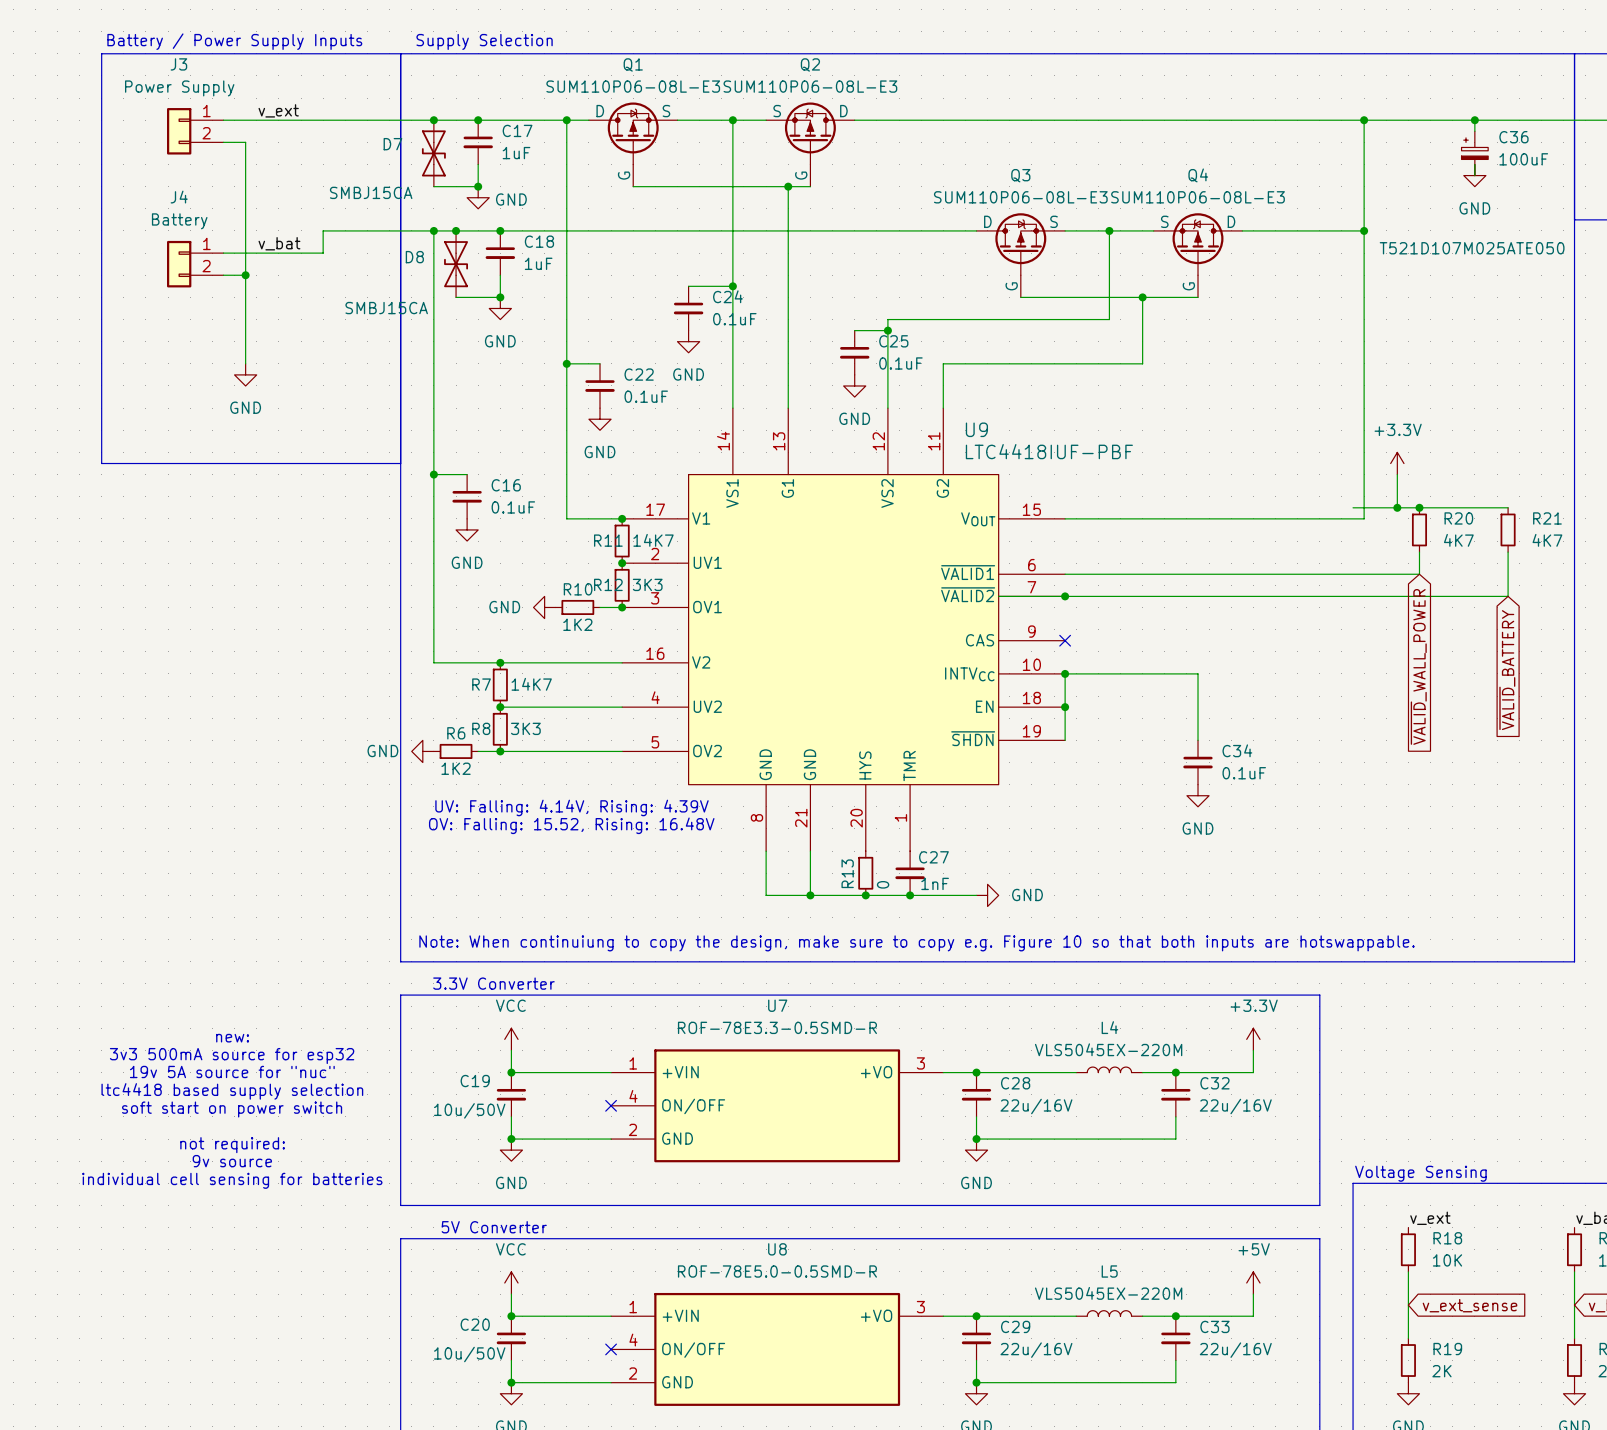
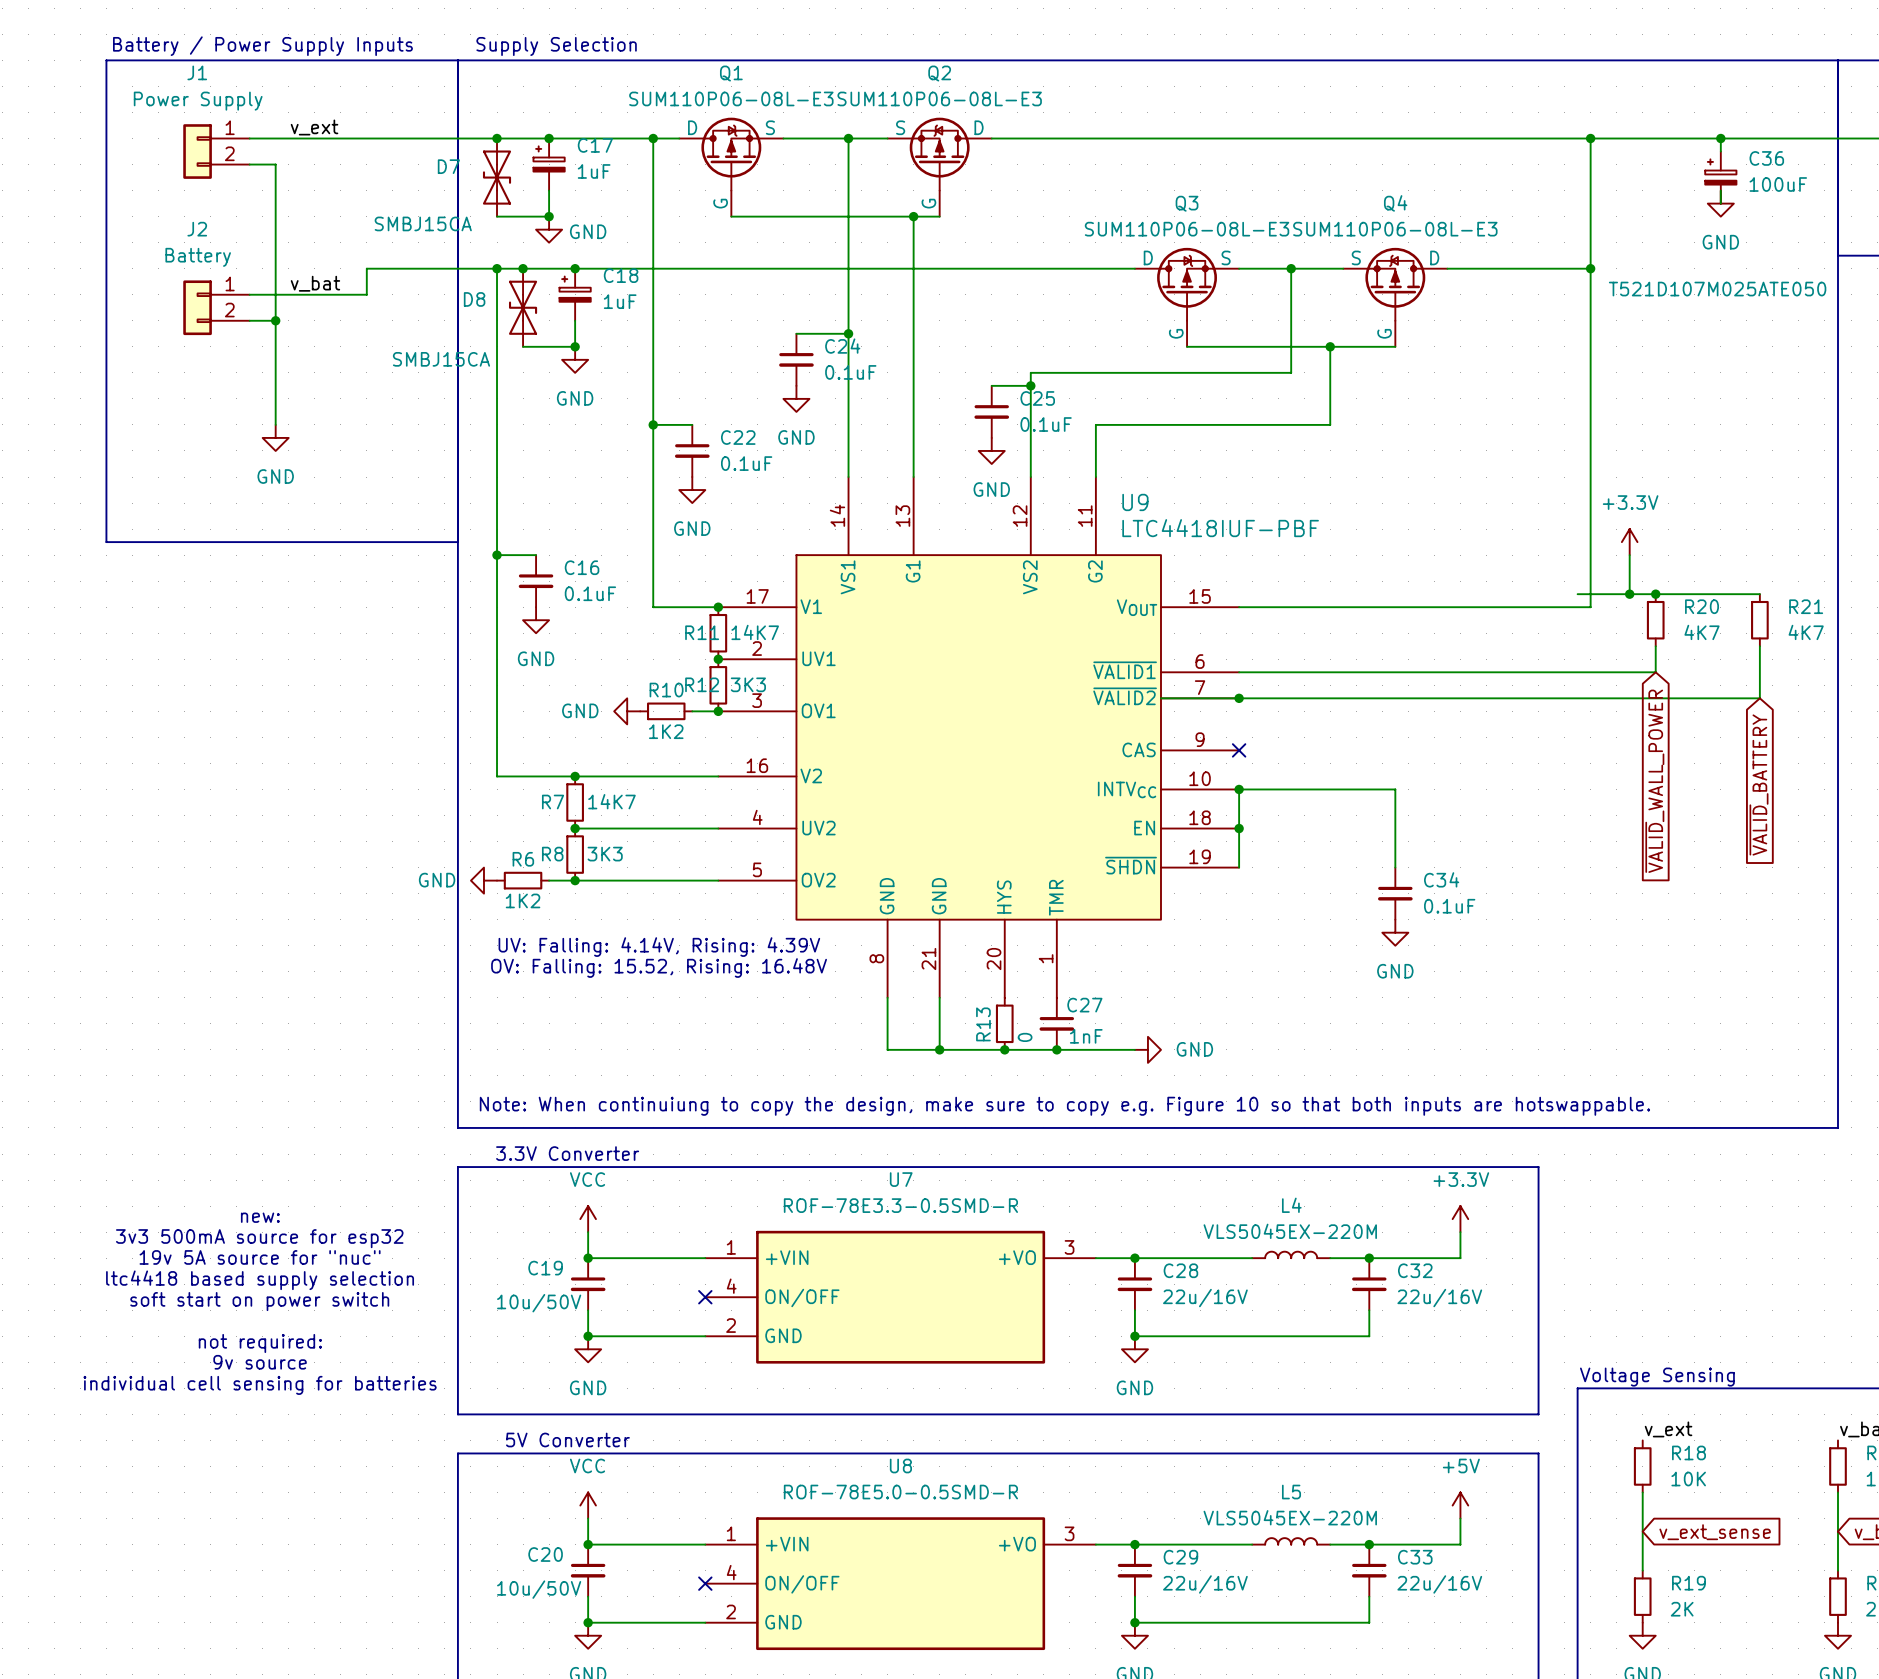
J3 name: J3 (178, 64) -> J1 (197, 72)
C17 symbol: [463, 120, 493, 165] -> [533, 138, 565, 191]
J4 name: J4 (179, 197) -> J2 (197, 229)
C18 symbol: [485, 230, 516, 276] -> [559, 268, 591, 321]

